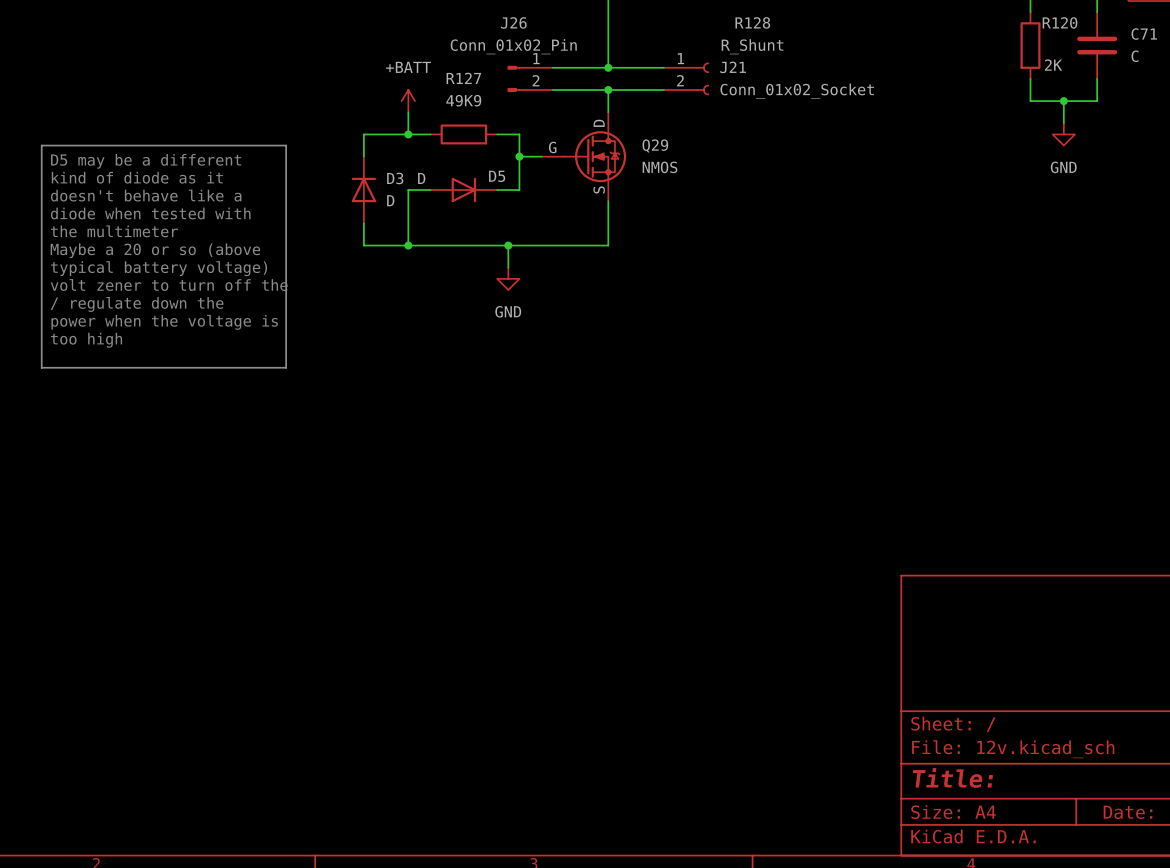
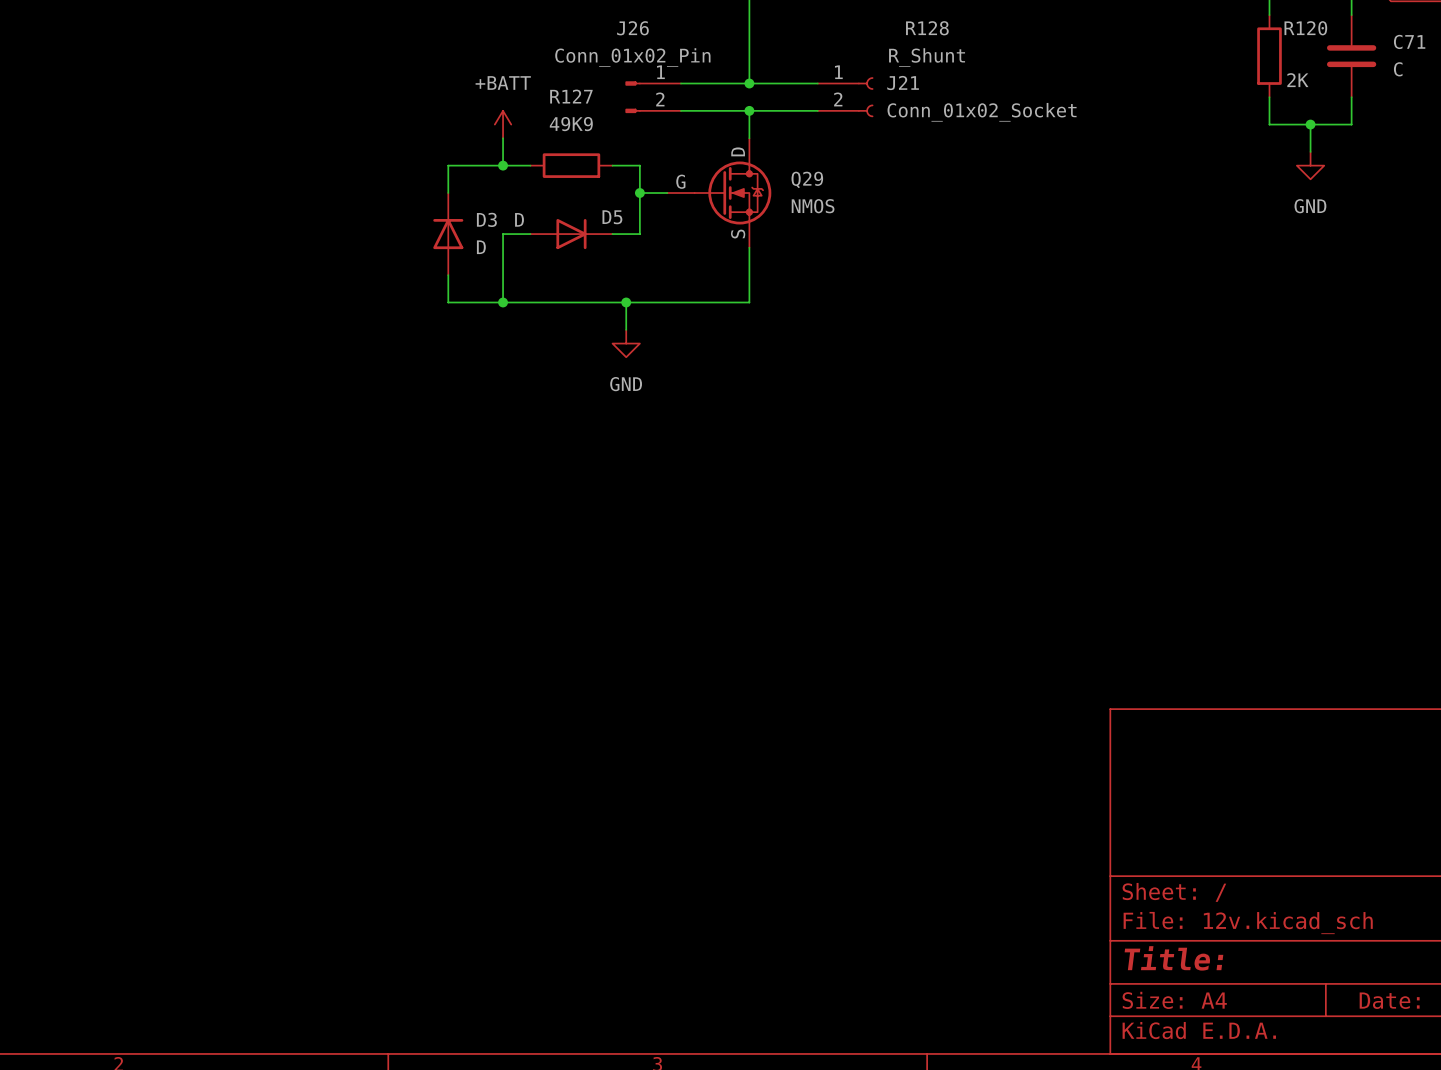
line: (41, 145) (286, 145) (286, 367) (41, 367) (41, 145) -> none
text: D5 may be a different (146, 161) -> none
text: kind of diode as it (137, 177) -> none
text: doesn't behave like a (146, 195) -> none
text: diode when tested with (150, 213) -> none
text: the multimeter (114, 231) -> none
text: Maybe a 20 or so (above (155, 250) -> none
text: typical battery voltage) (159, 268) -> none
text: volt zener to turn off the (169, 285) -> none
text: / regulate down the (137, 304) -> none
text: power when the voltage is (164, 322) -> none
text: too high (86, 340) -> none

